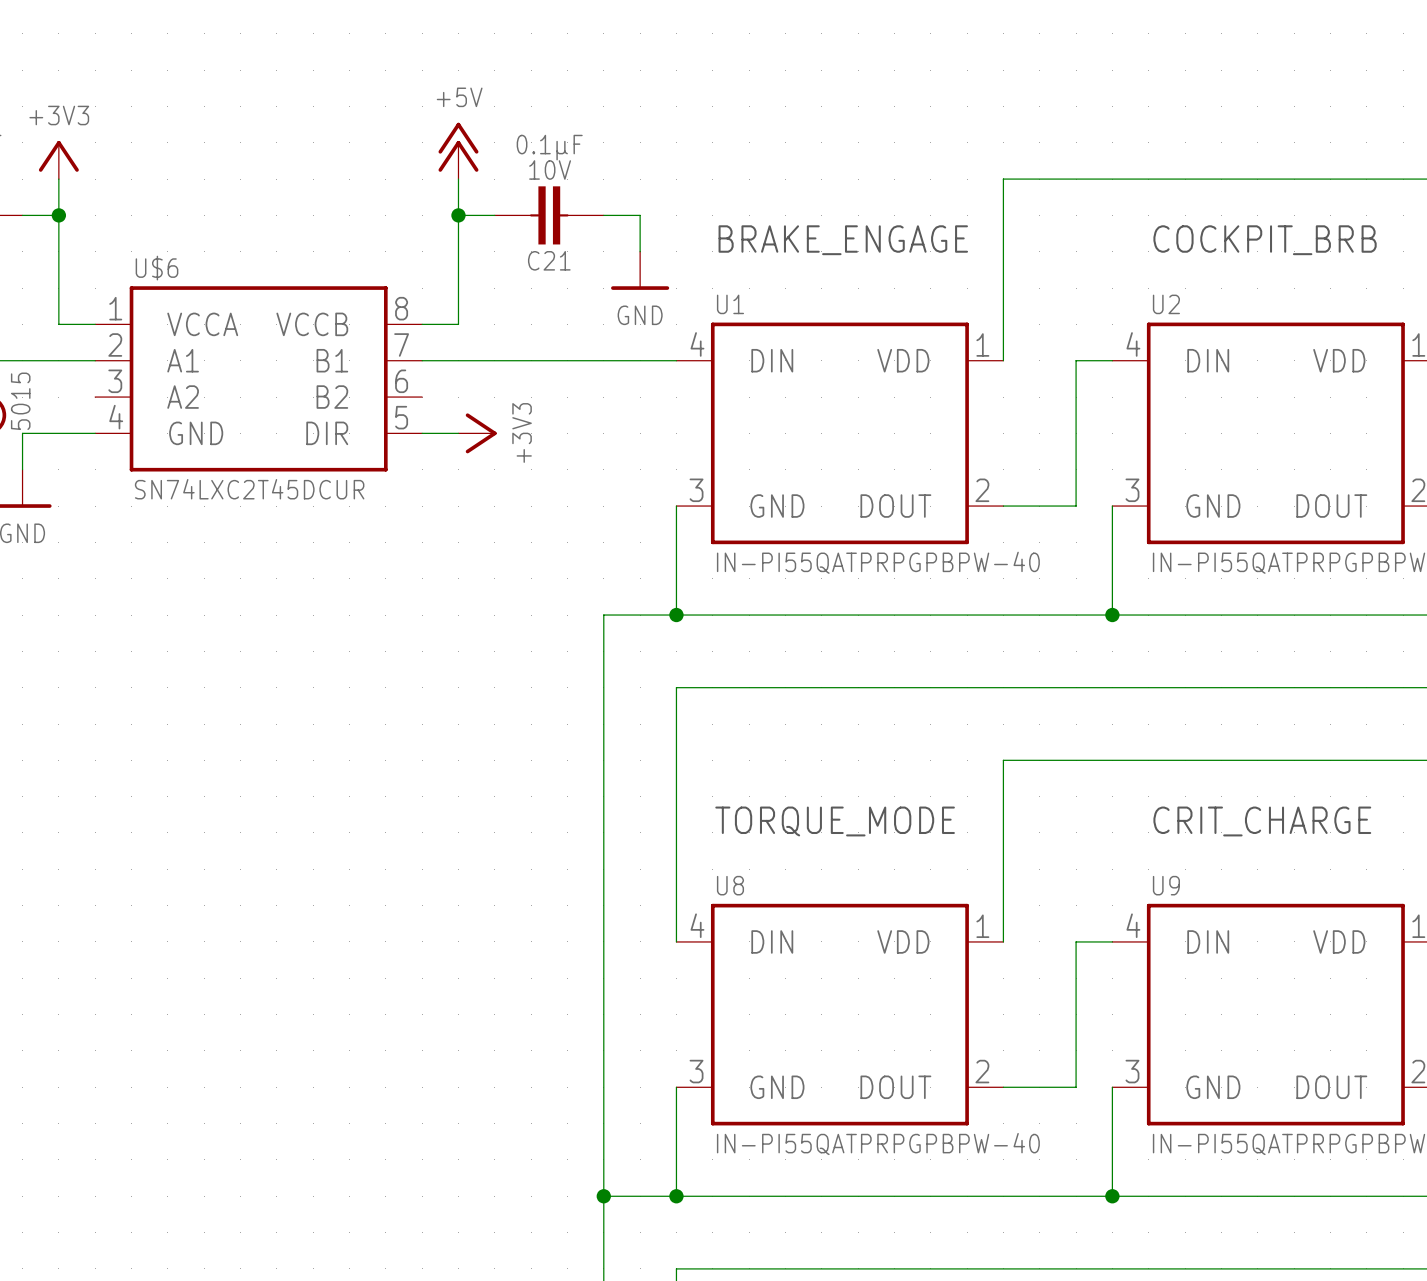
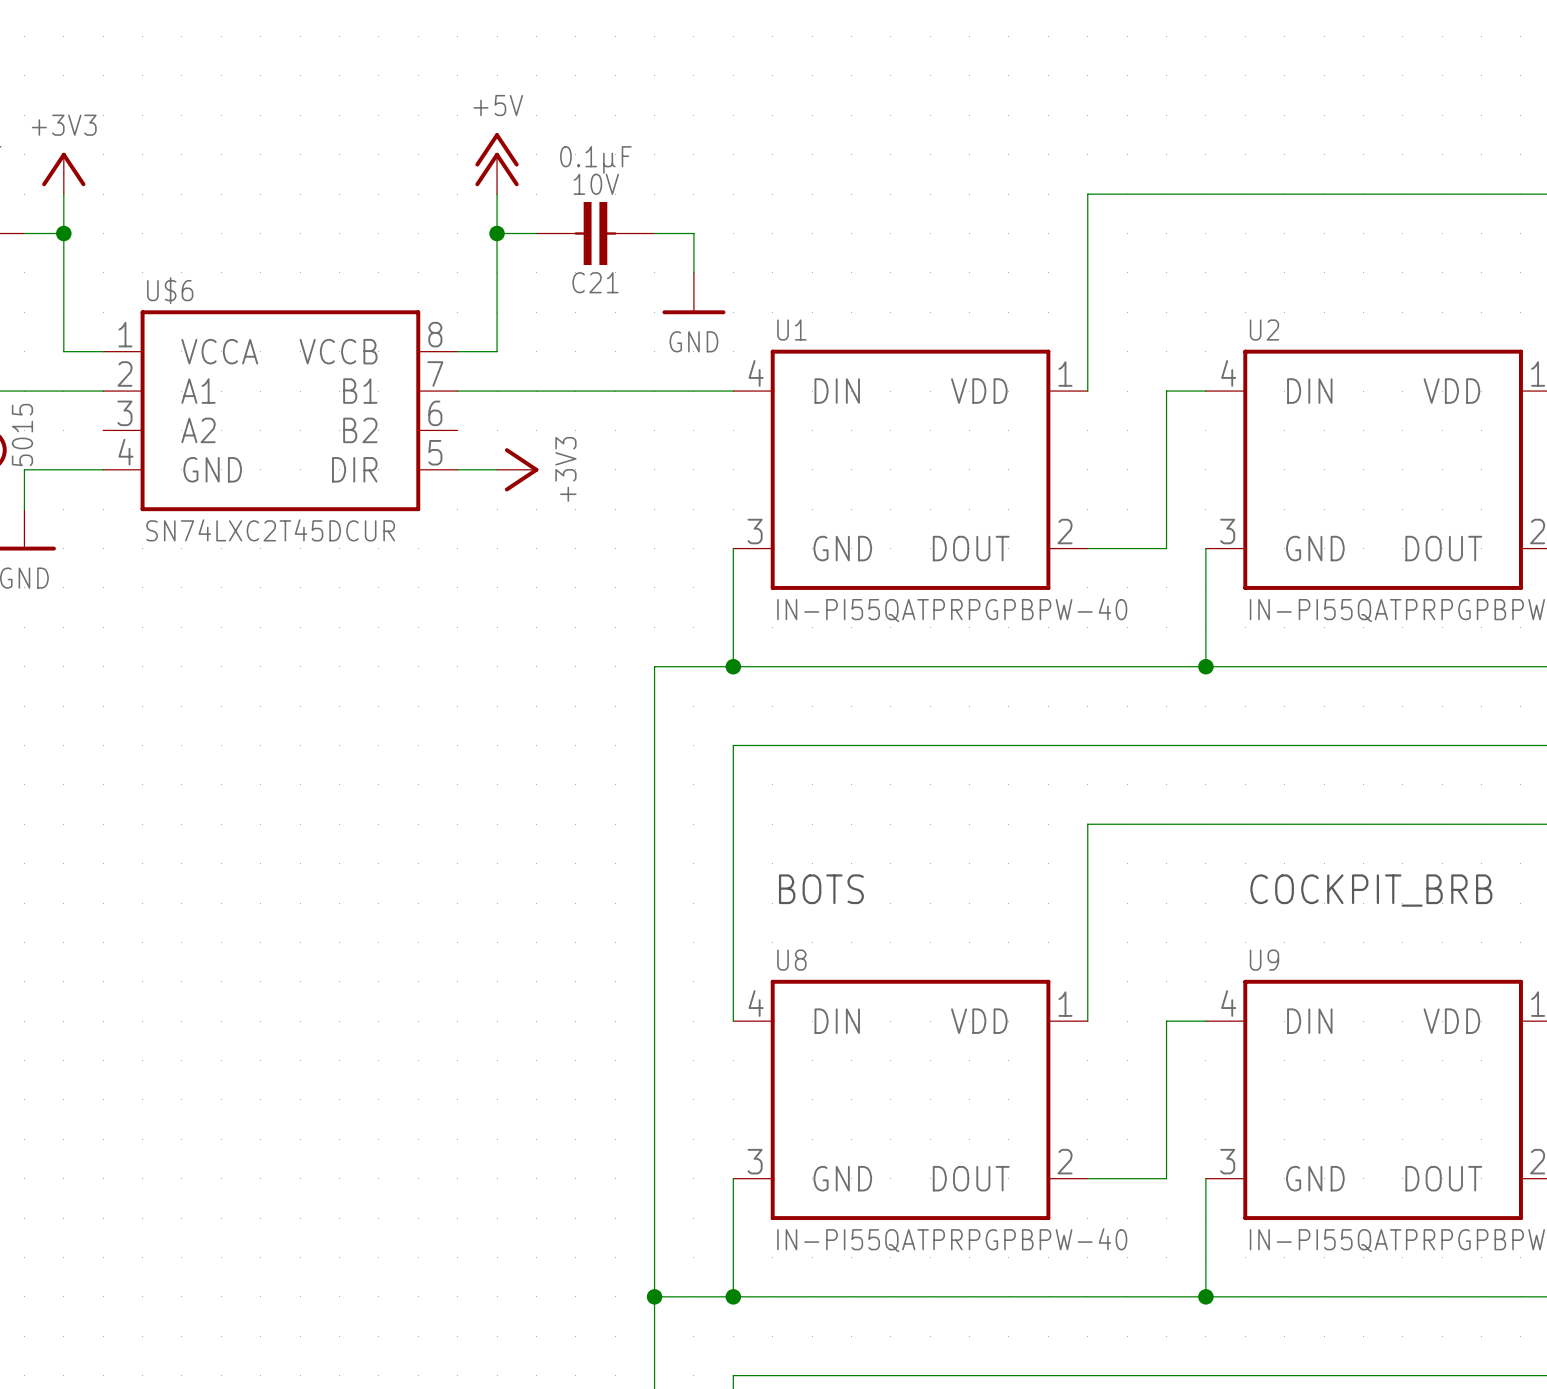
text: BRAKE_ENGAGE (843, 240) -> none
text: COCKPIT_BRB (1265, 240) -> none
text: TORQUE_MODE (835, 821) -> BOTS (821, 889)
text: CRIT_CHARGE (1262, 821) -> COCKPIT_BRB (1371, 890)

